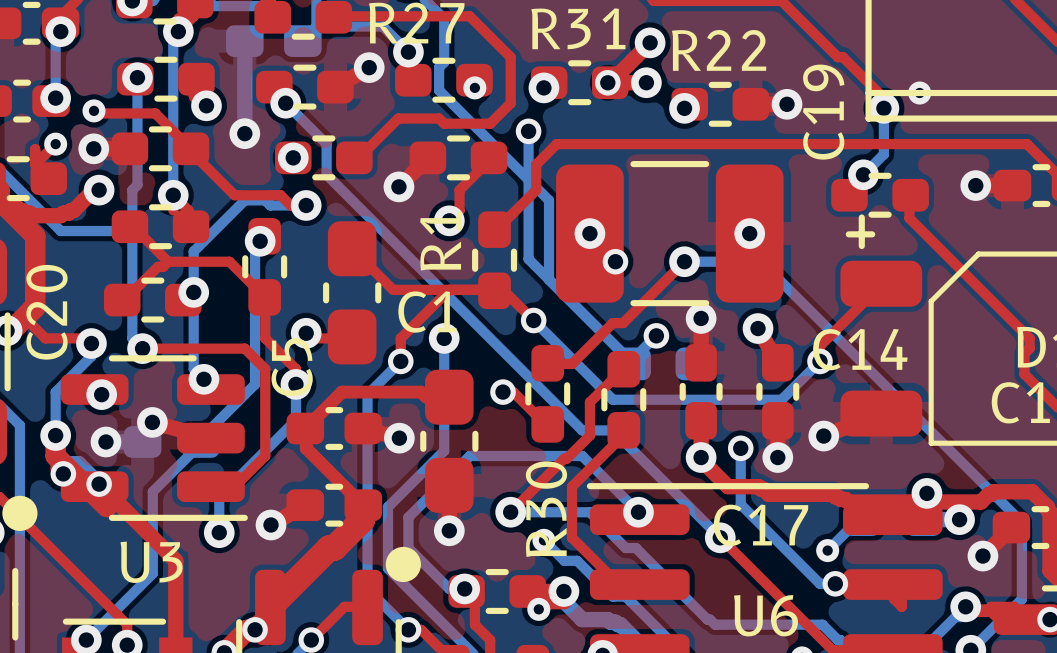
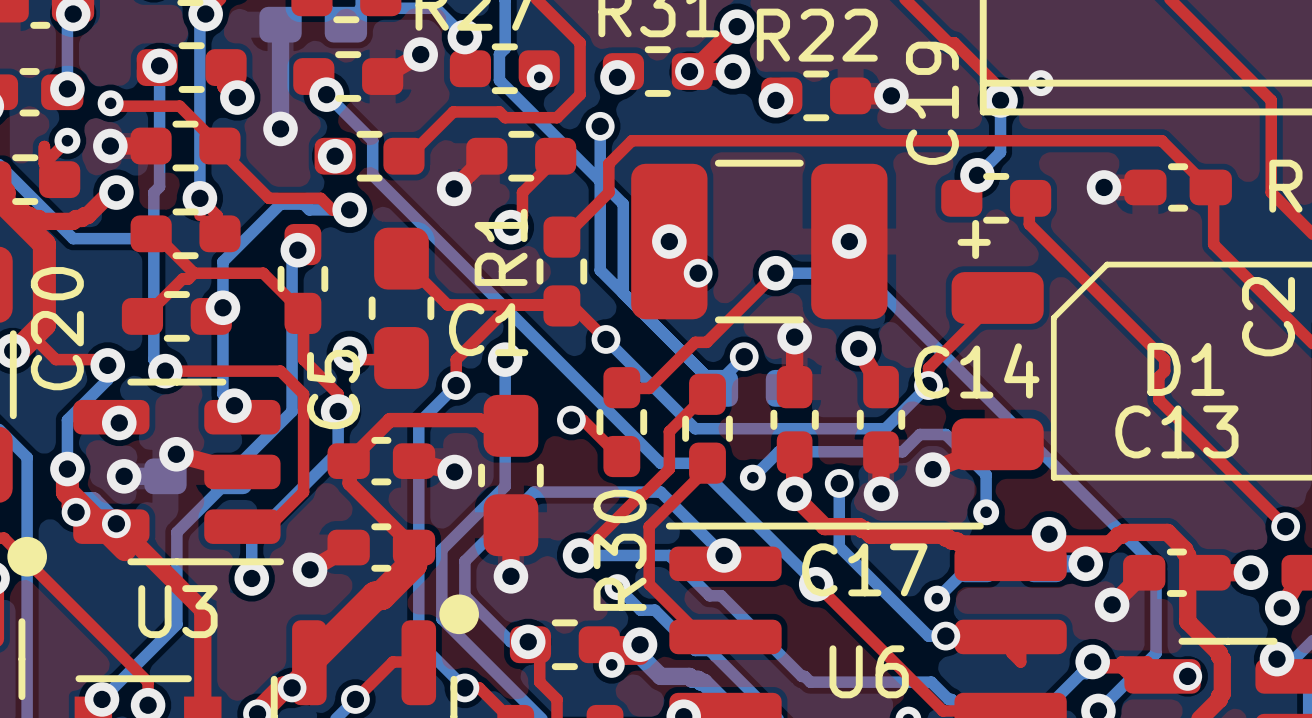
bottom track: none -> (752, 477) (778, 451) (902, 451) (919, 434) (945, 434) (986, 474) (986, 512)
via: none -> (752, 477)
via: none -> (986, 512)

